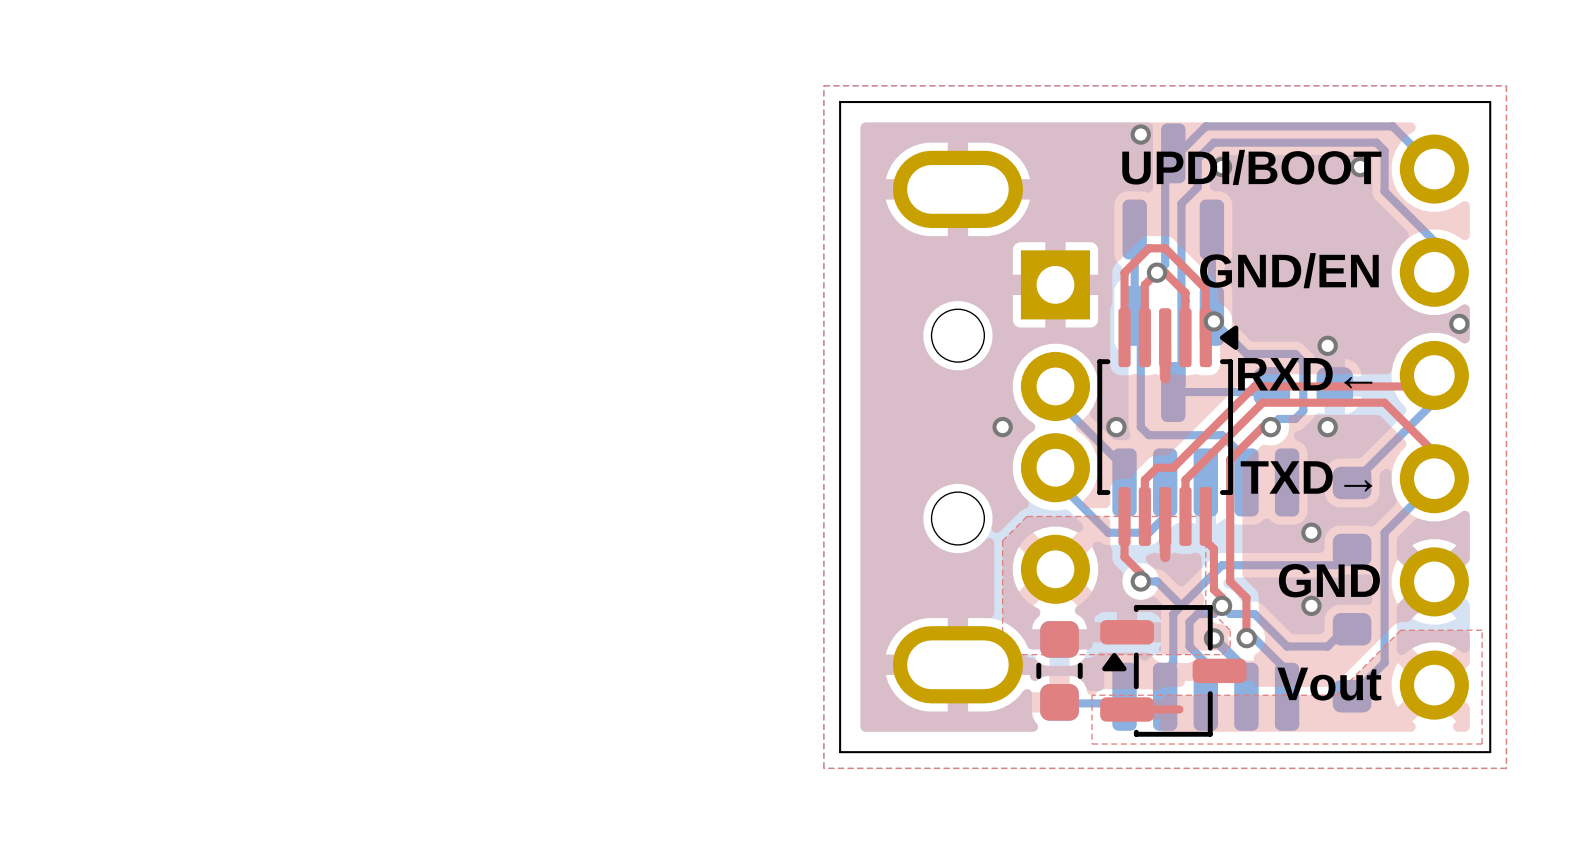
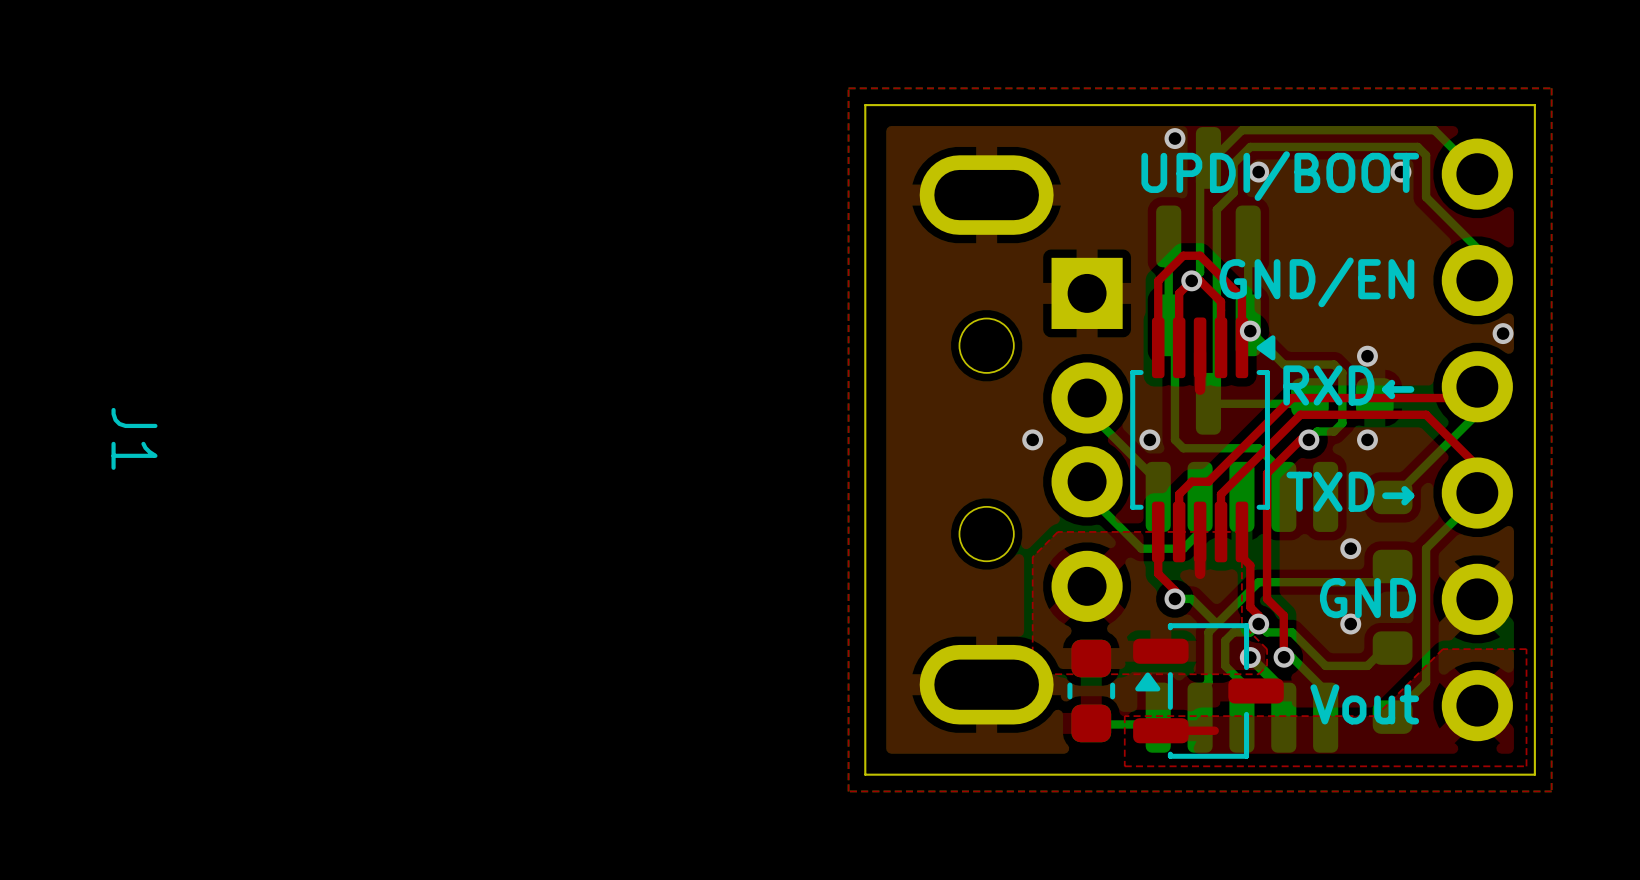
J1 name: none -> J1 (134, 438)

